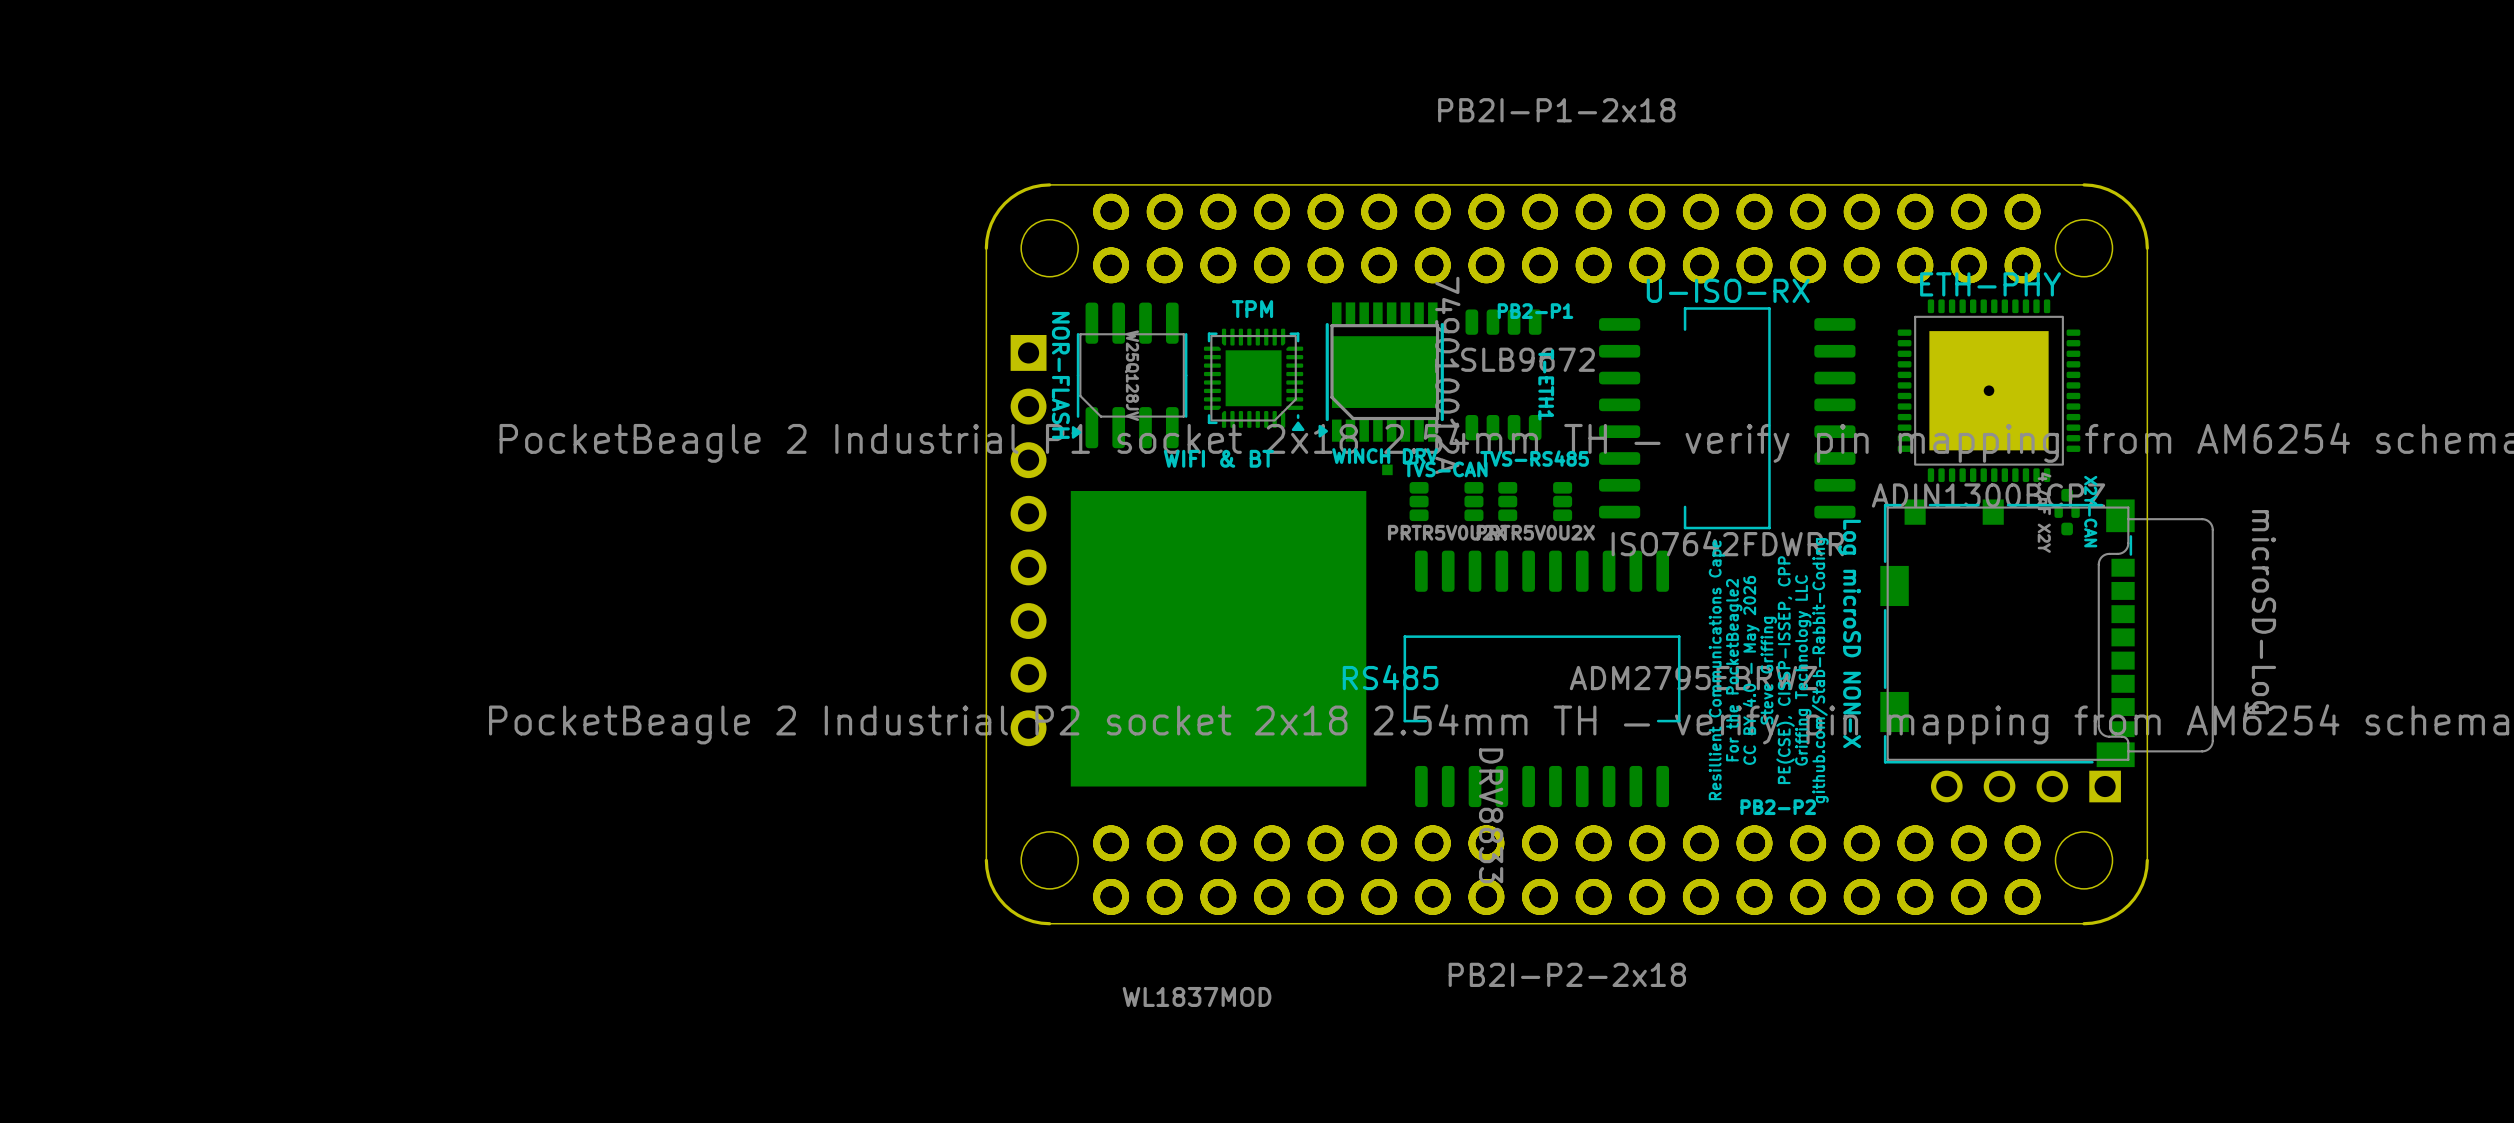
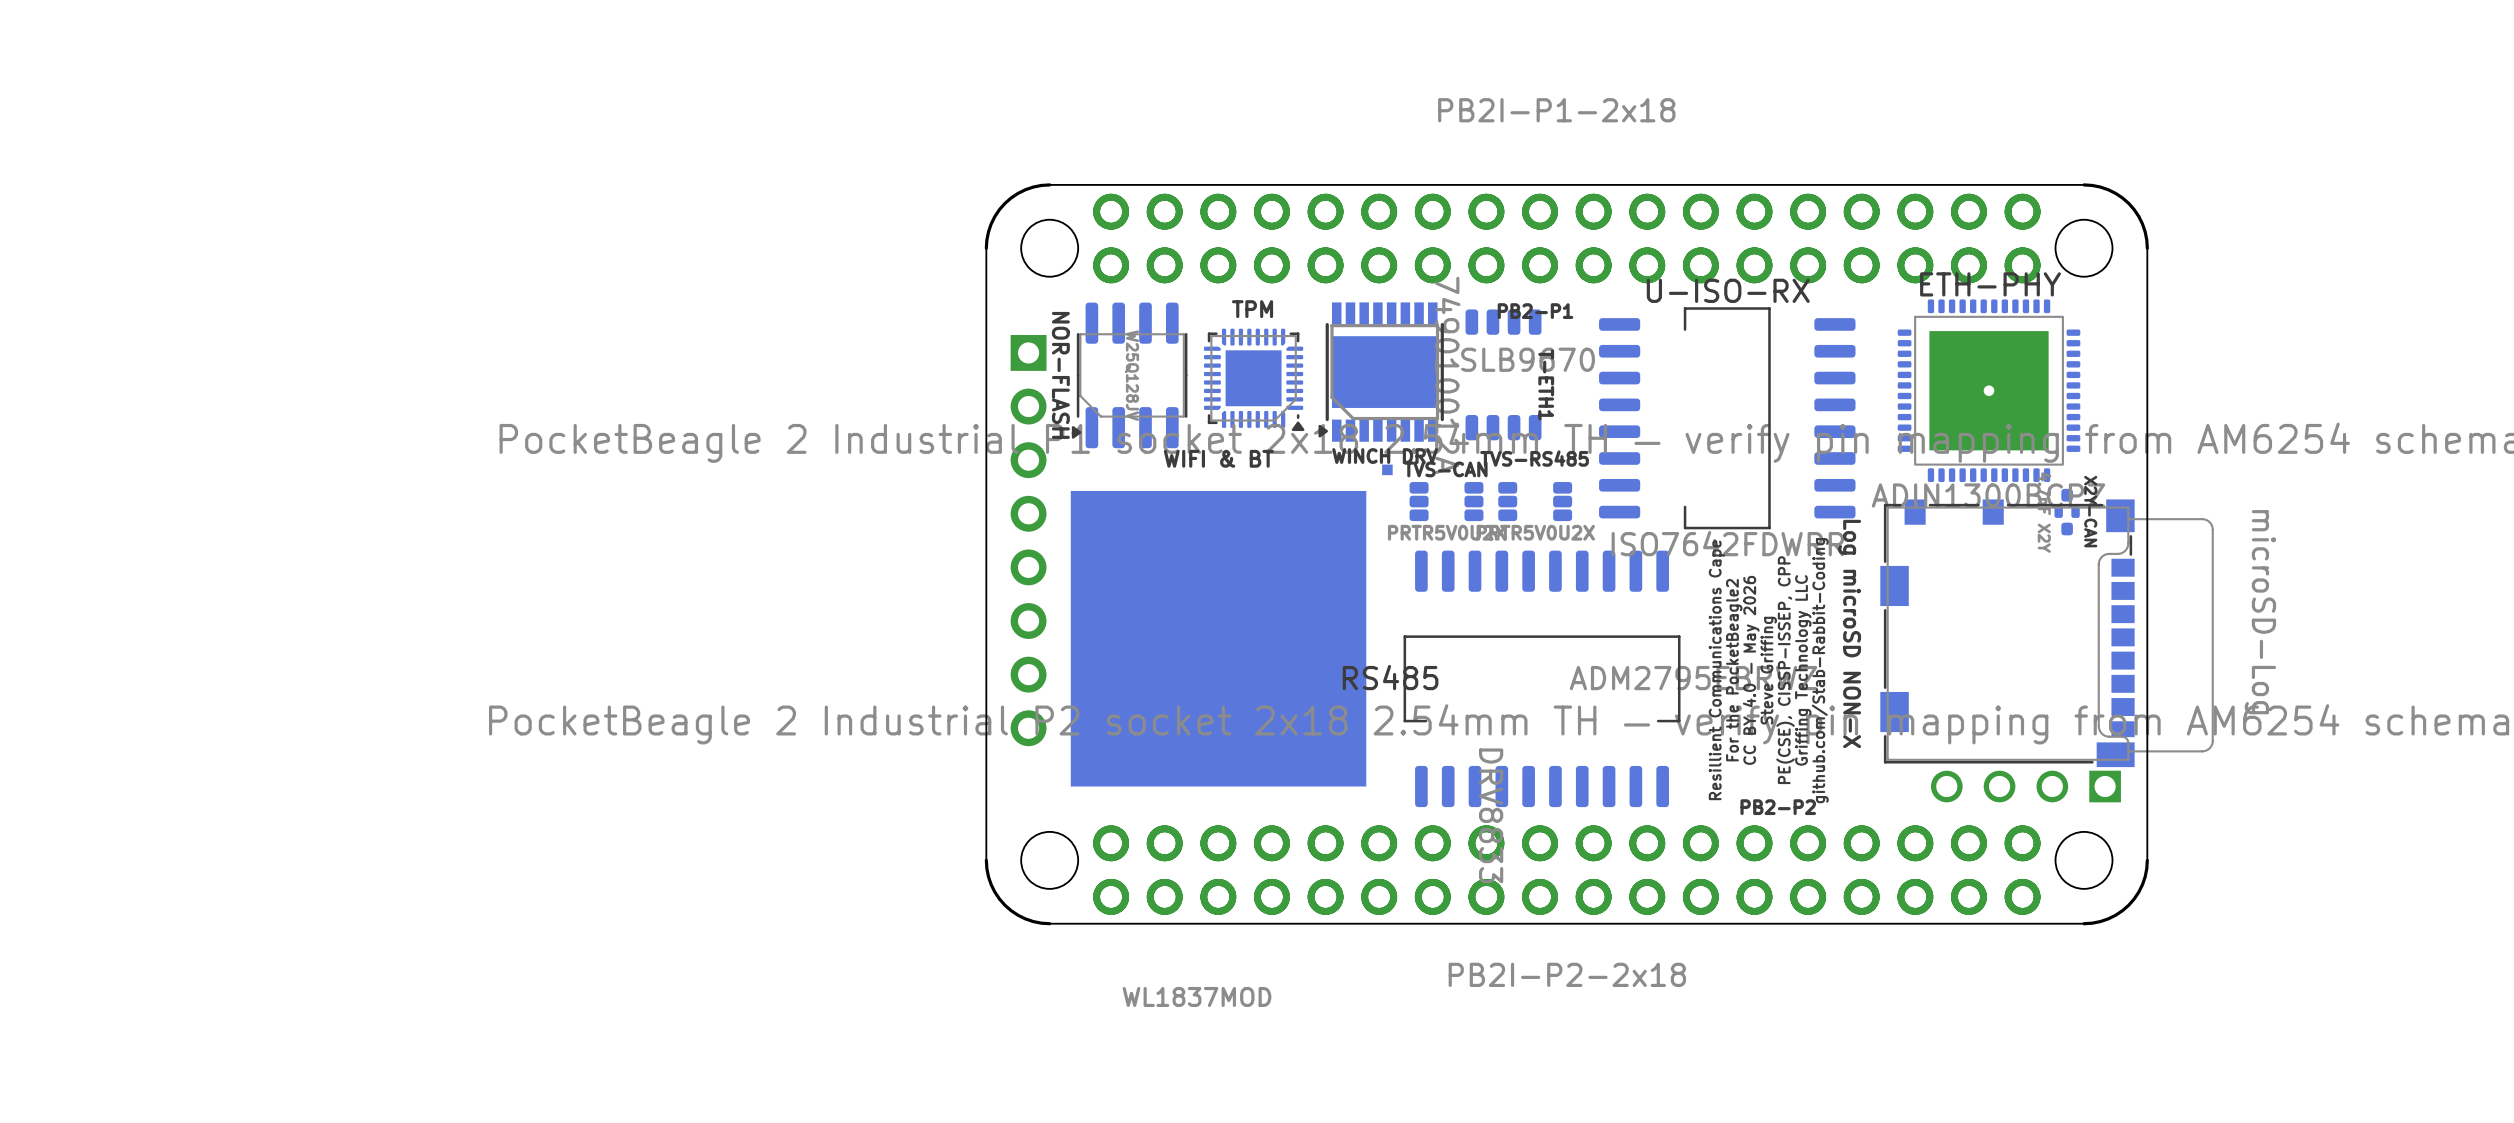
TPM value: SLB9672 (1528, 359) -> SLB9670 (1528, 359)

